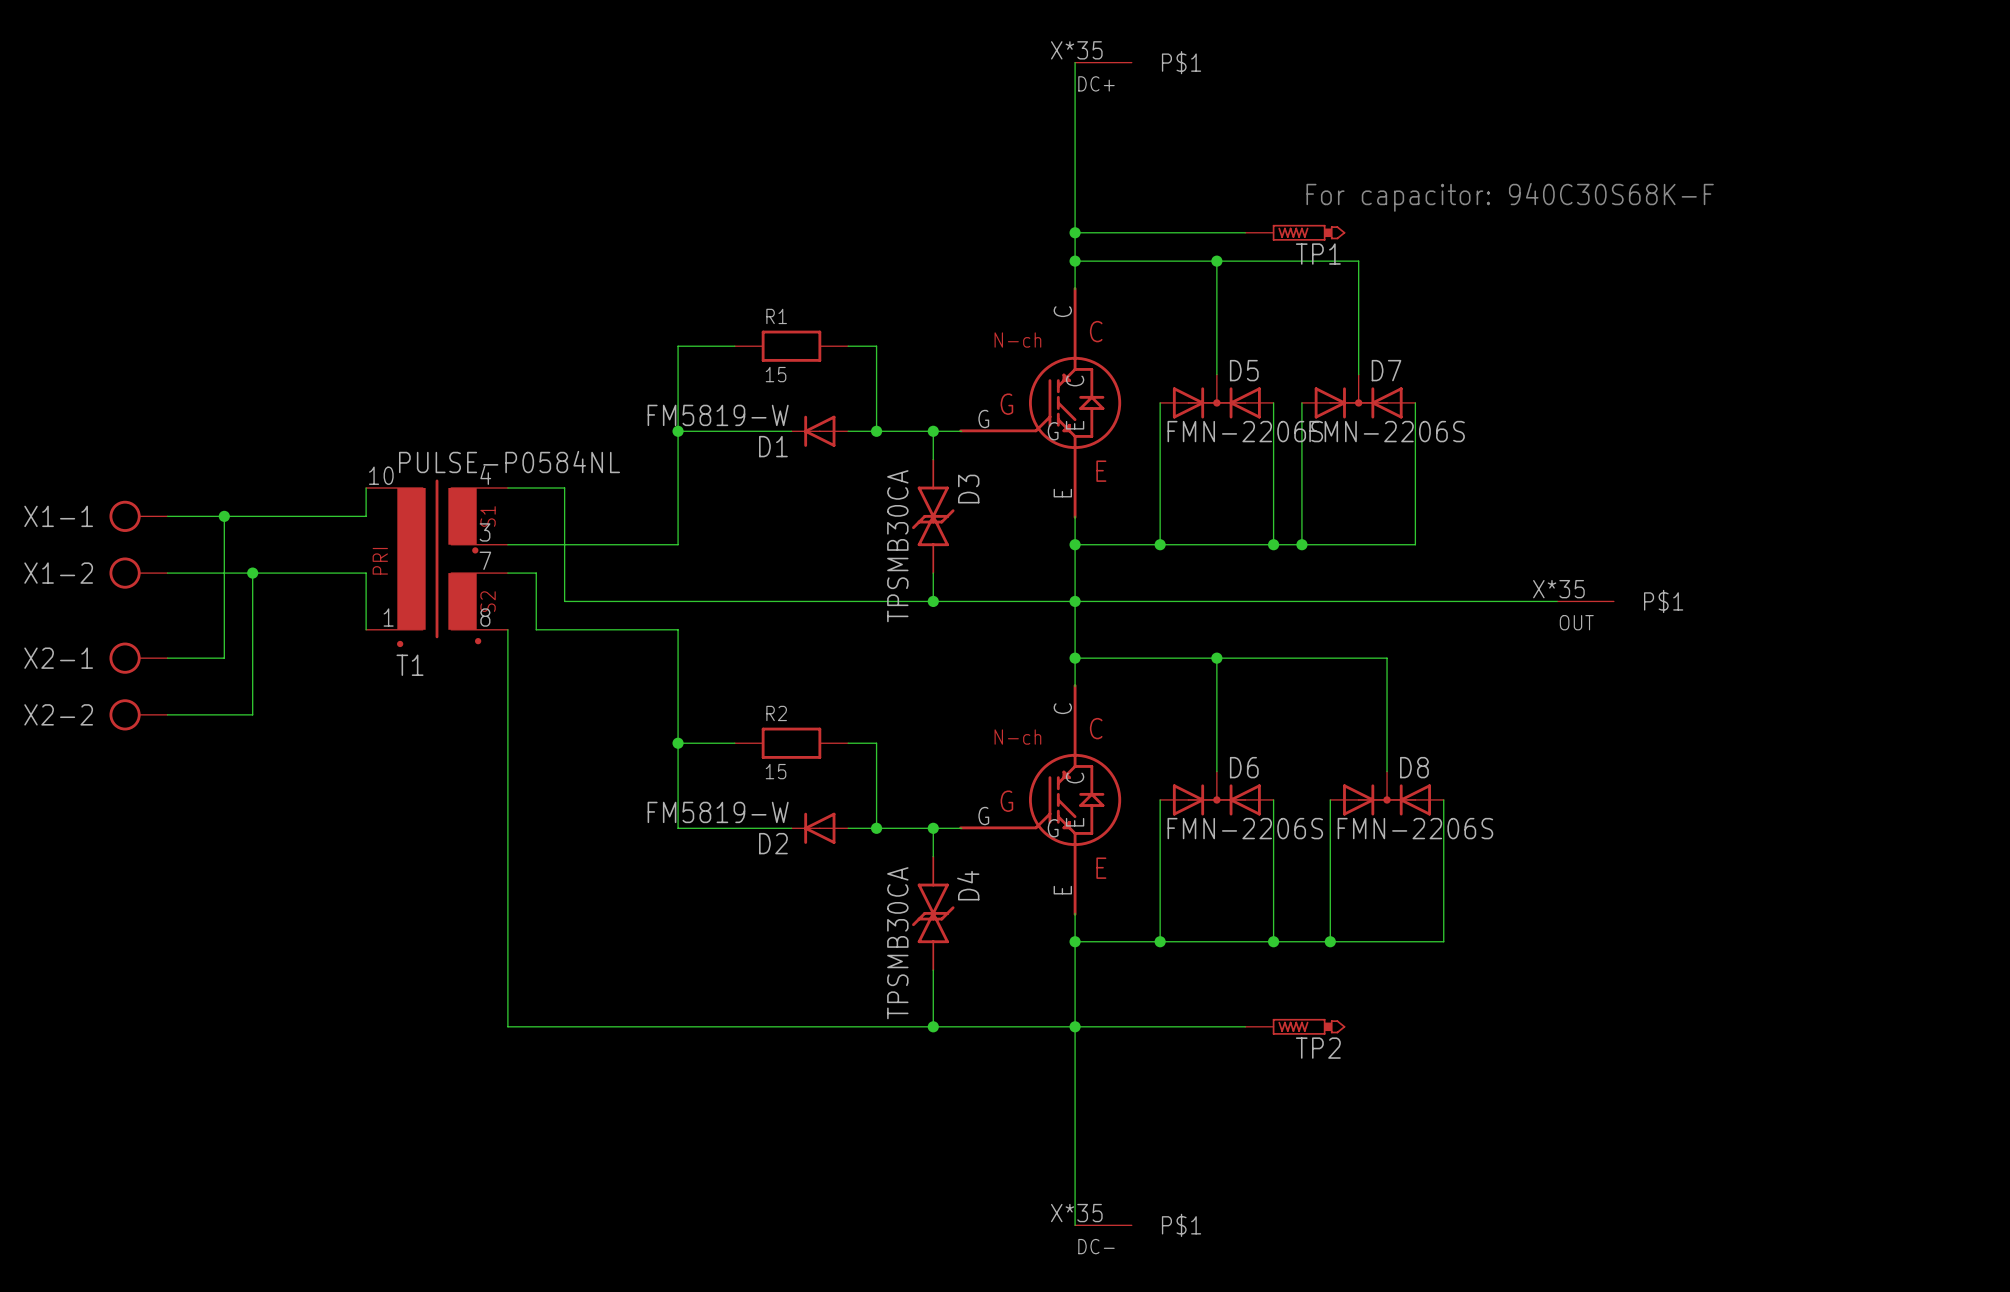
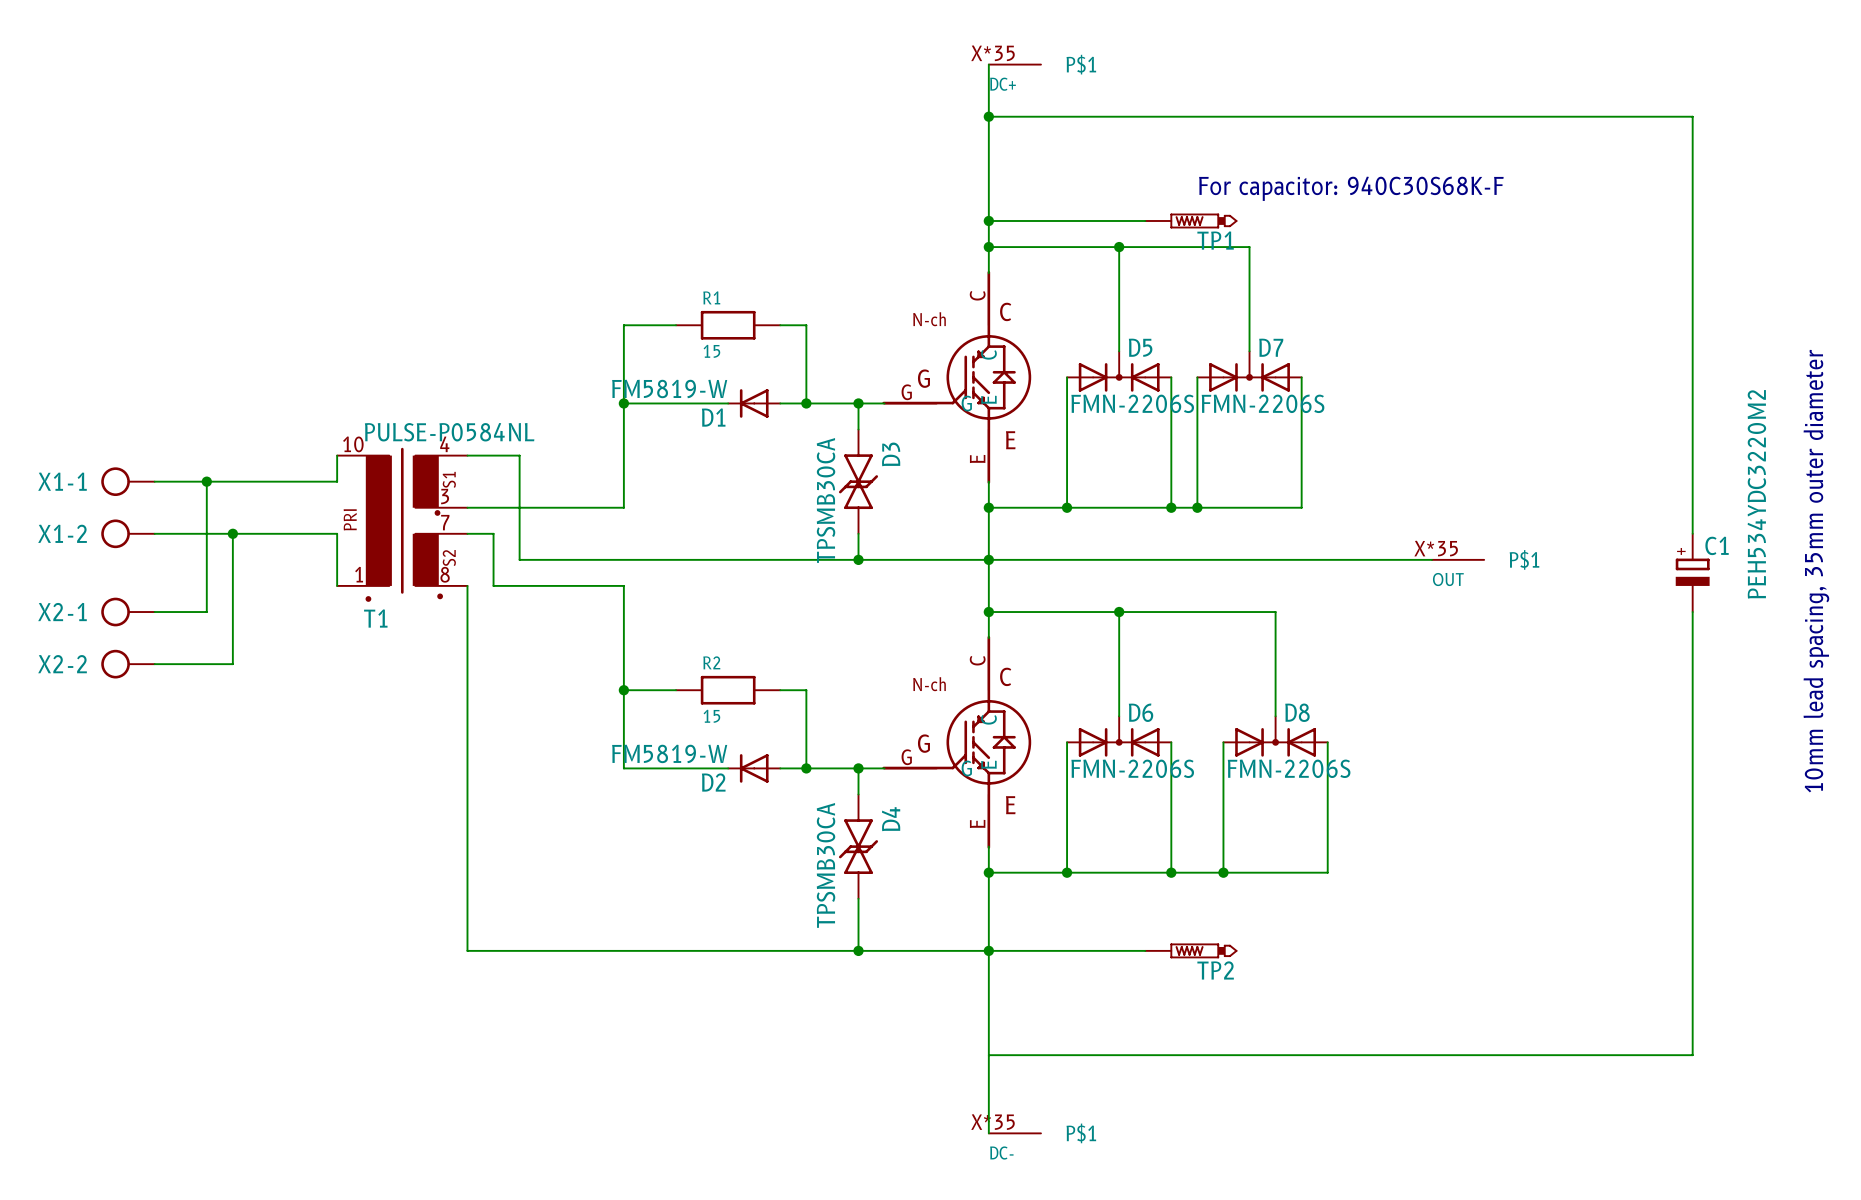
wire: none -> (988, 116) (1692, 116) (1692, 533)
junction: none -> (988, 116)
text: none -> 10mm lead spacing, 35mm outer diameter (1816, 571)
C1: none -> PEH534YDC3220M2 (1692, 572)
wire: none -> (1692, 612) (1692, 1055) (988, 1055)

